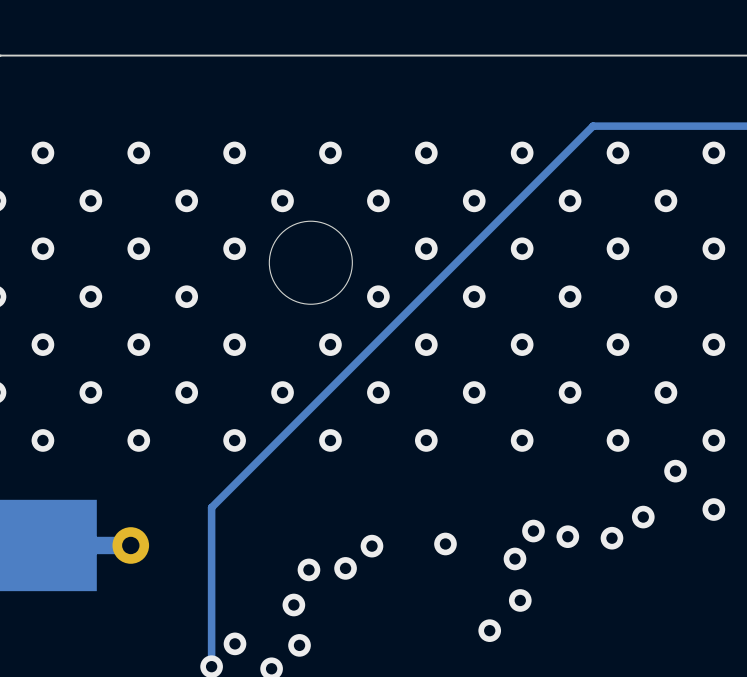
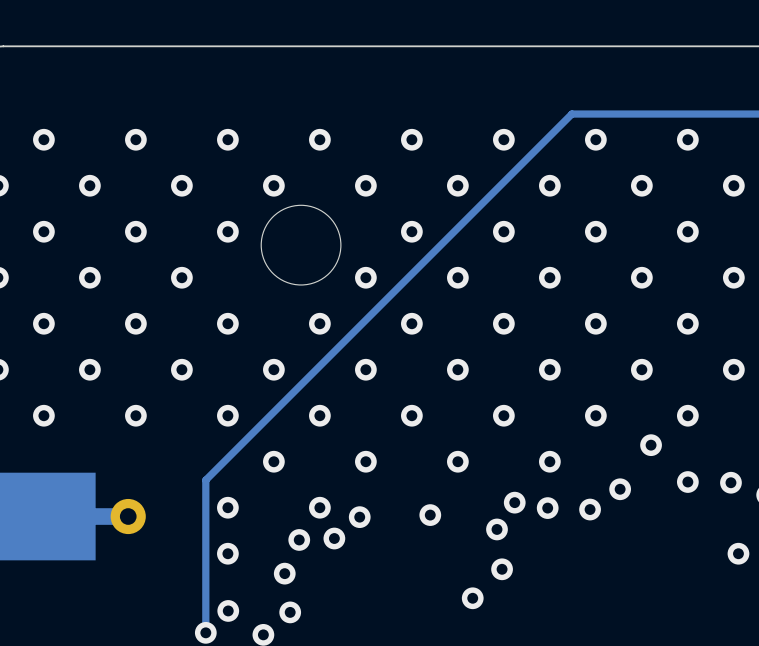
via: none -> (273, 461)
via: none -> (365, 461)
via: none -> (457, 461)
via: none -> (549, 461)
via: none -> (227, 507)
via: none -> (319, 507)
via: none -> (227, 553)

